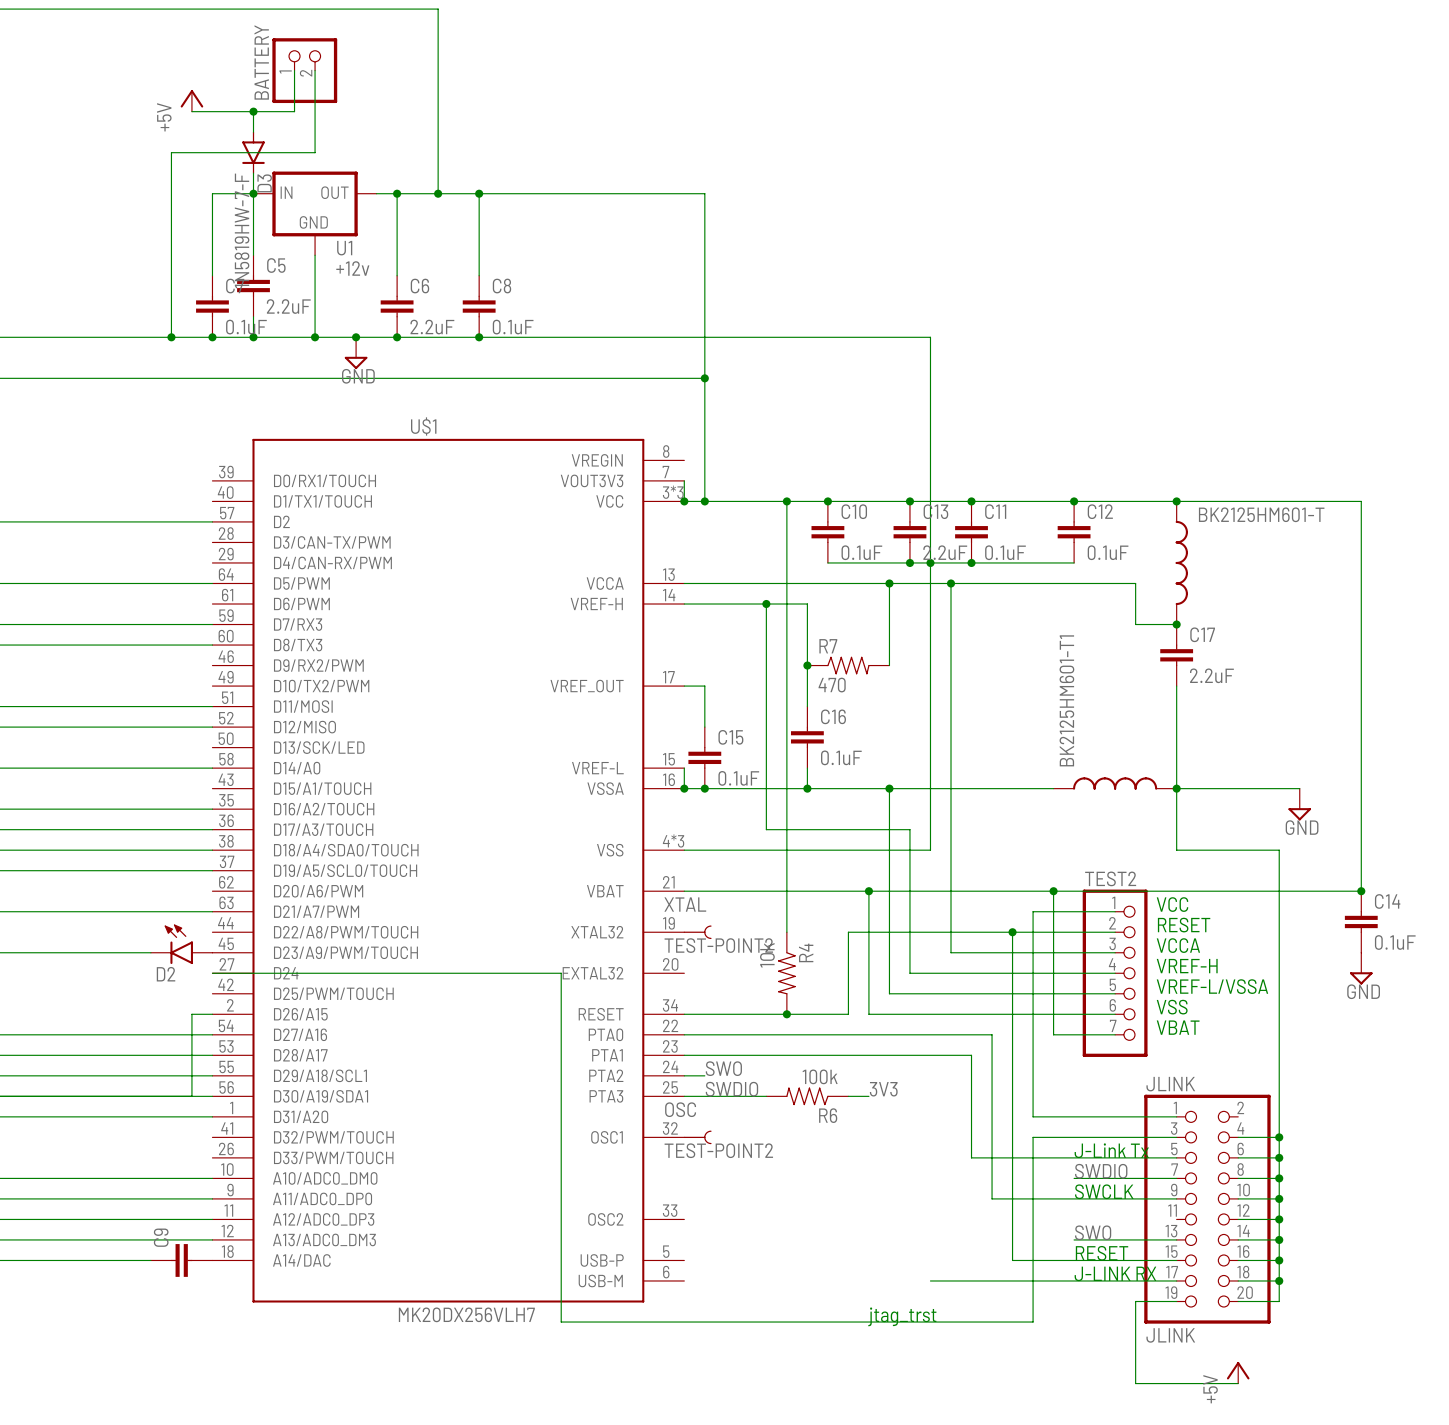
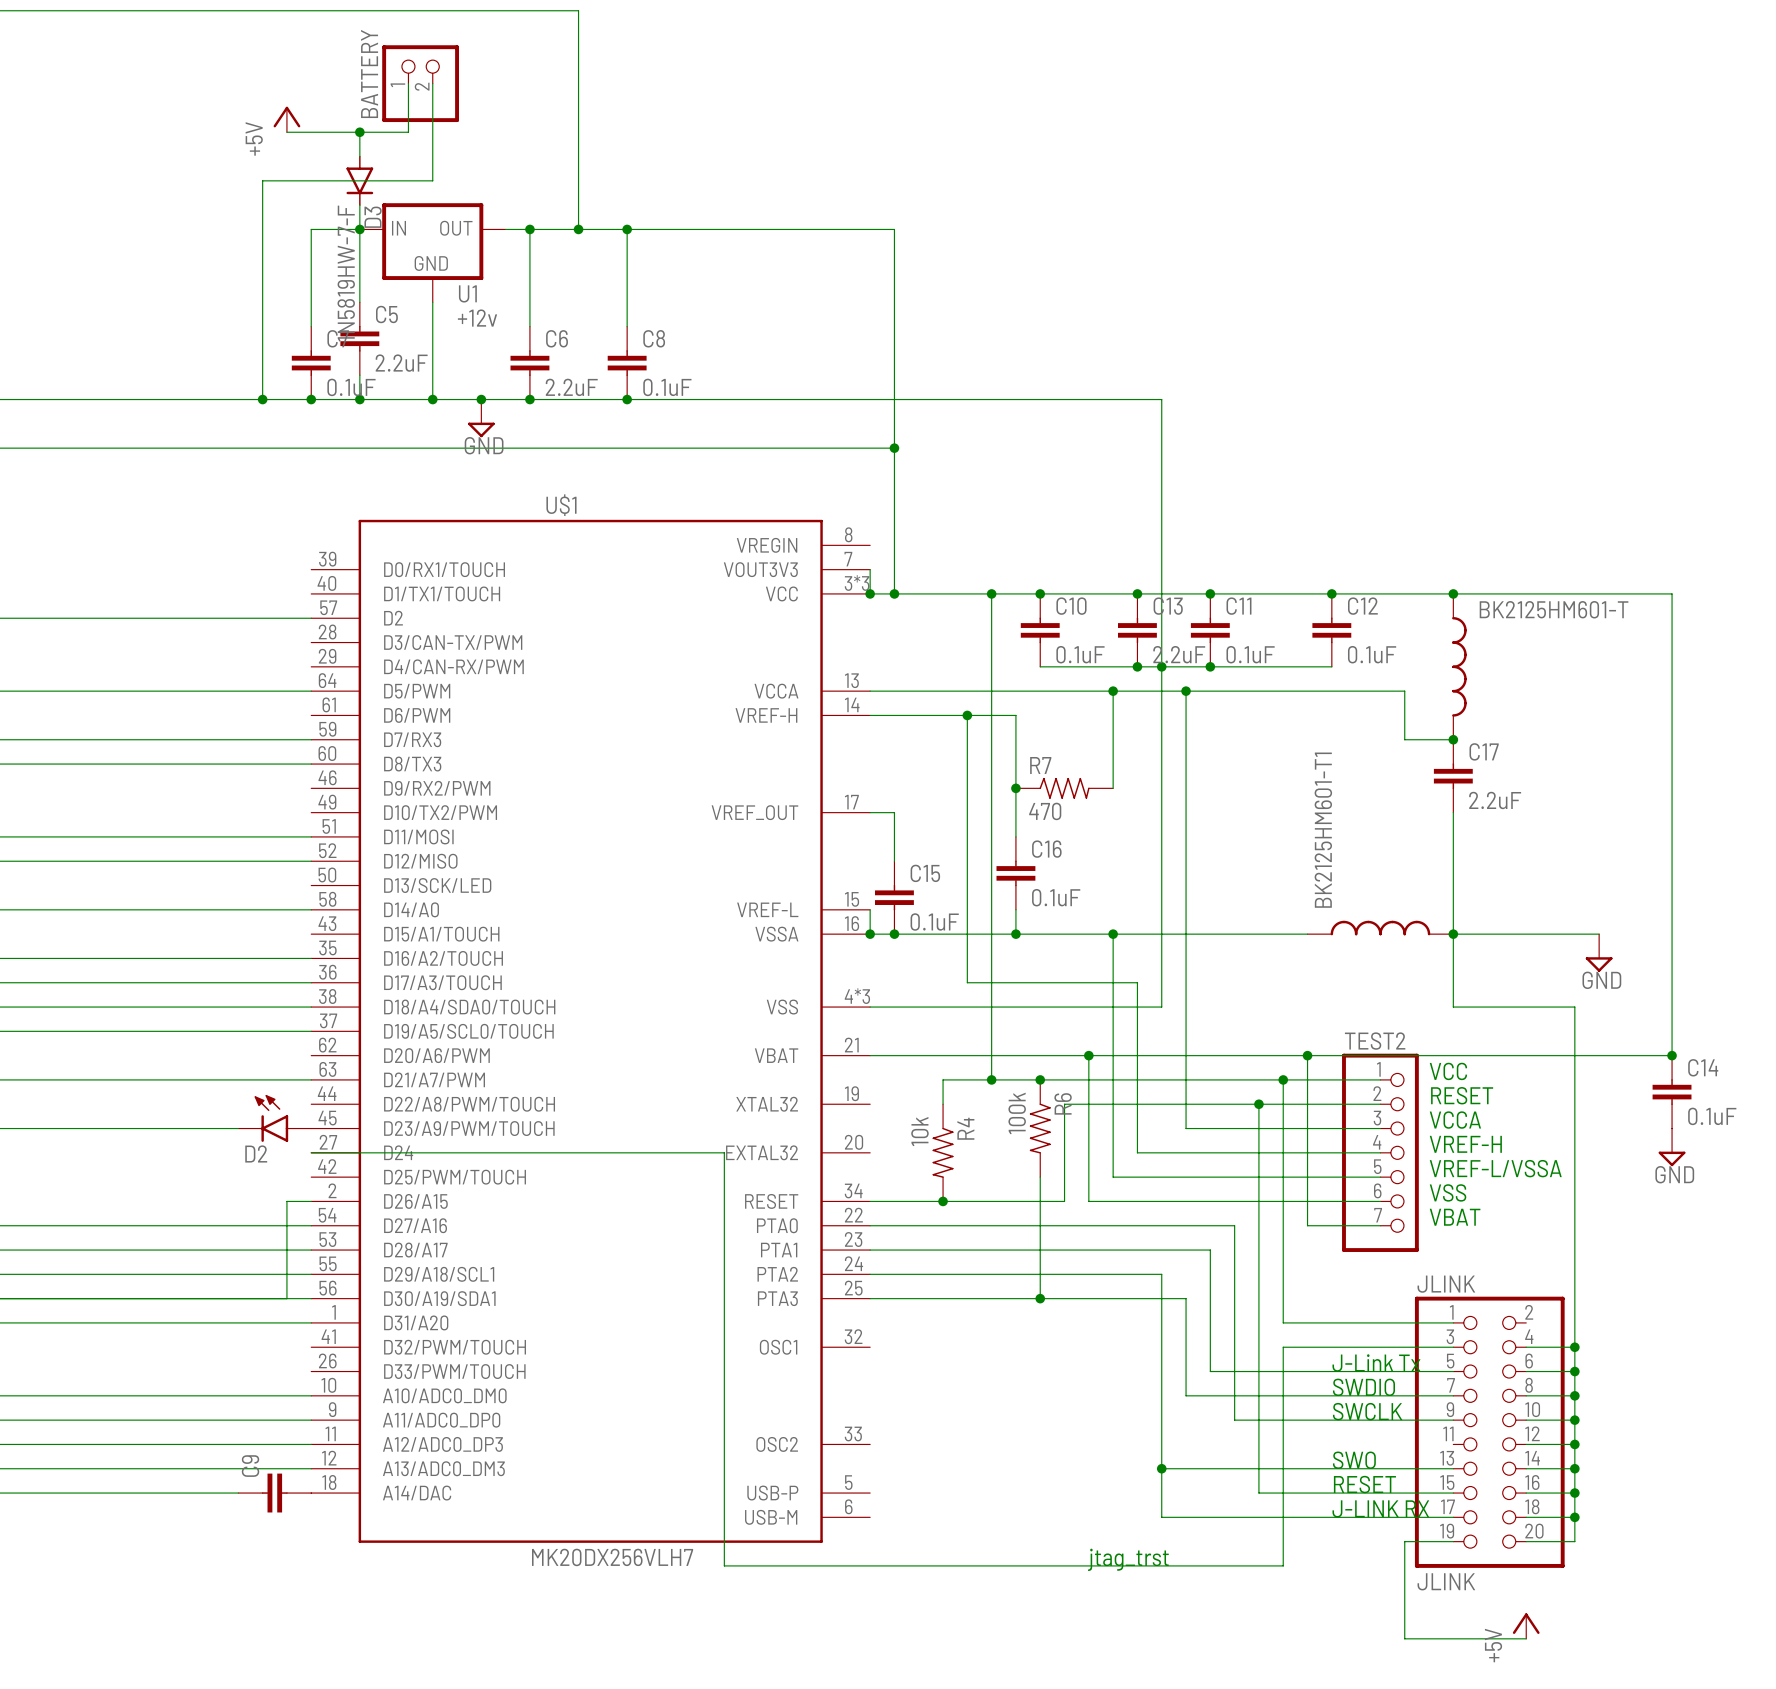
wire: (786, 911) (786, 932) -> none
junction: none -> (991, 1079)
junction: none -> (1040, 1079)
wire: none -> (1283, 1079) (943, 1079) (943, 1104)
junction: none -> (1283, 1079)
XTAL: TEST-POINT2 (697, 932) -> none
R4 position: (786, 973) -> (943, 1152)
wire: none -> (1040, 1177) (1040, 1298)
junction position: (786, 1014) -> (943, 1201)
label: SWO (723, 1068) -> none
wire: none -> (894, 1274) (1161, 1274) (1161, 1517)
label: SWDIO (731, 1089) -> none
label: 3V3 (883, 1089) -> none
R6 rotation: 0° (807, 1096) -> 90° counterclockwise (1040, 1128)
R6 position: (807, 1096) -> (1040, 1128)
junction: none -> (1040, 1298)
wire: none -> (1088, 1298) (1186, 1298) (1186, 1395) (1331, 1395)
OSC: TEST-POINT2 (697, 1137) -> none
label: SWDIO (1101, 1171) -> none
text: none -> SWDIO (1363, 1387)
label: SWO (1093, 1232) -> none
text: none -> SWO (1354, 1460)
wire: none -> (1161, 1468) (1331, 1468)
junction: none -> (1161, 1468)

